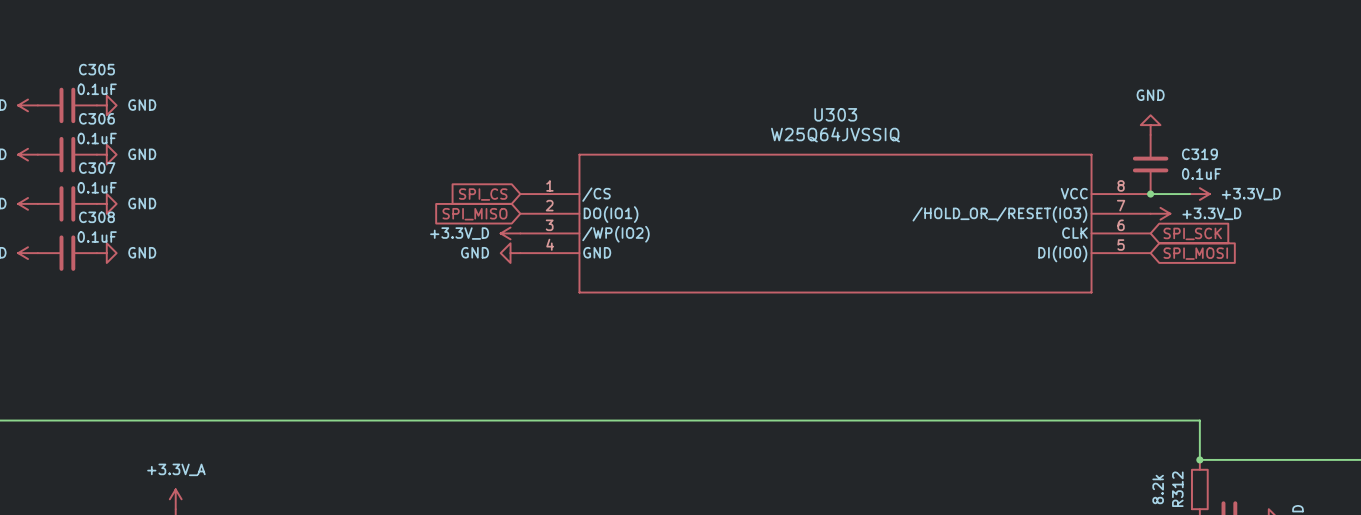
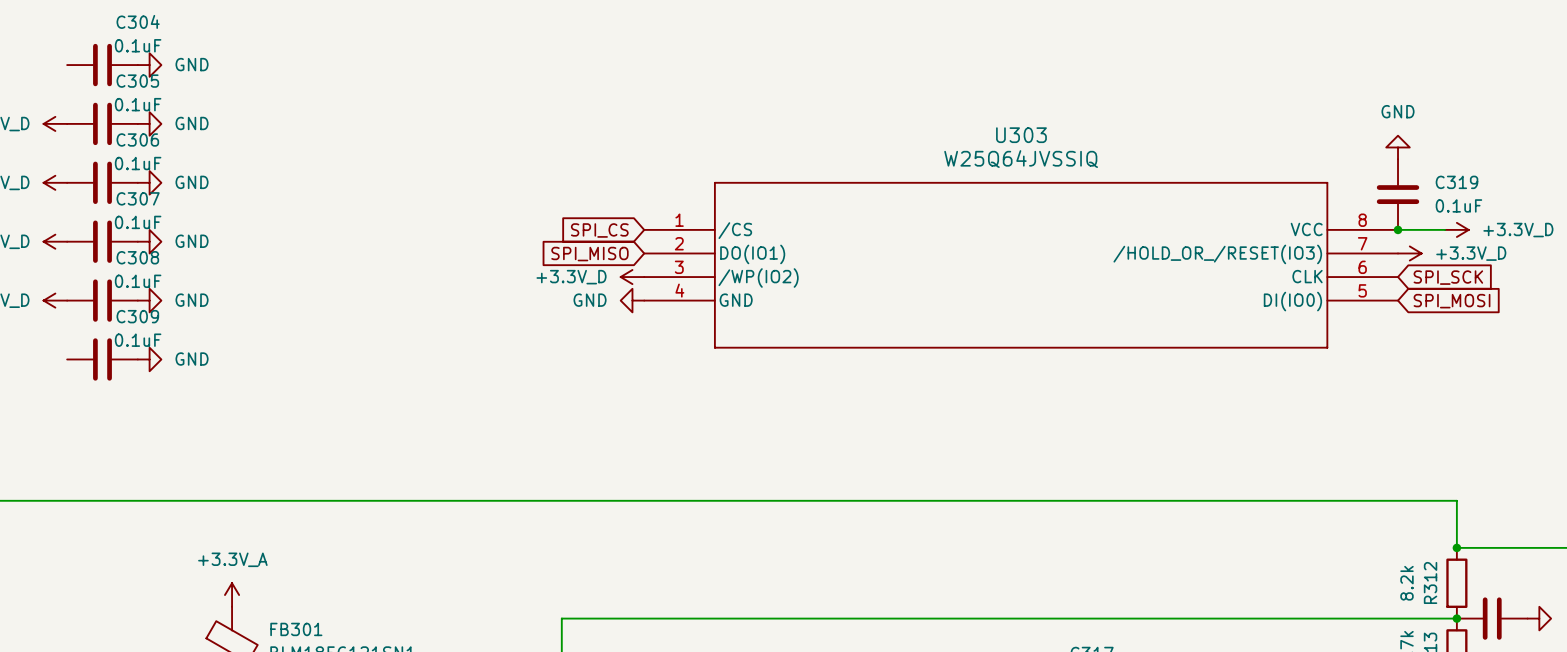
C304: none -> 0.1uF (102, 65)
power symbol: none -> GND (149, 65)
C309: none -> 0.1uF (102, 359)
power symbol: none -> GND (149, 359)

